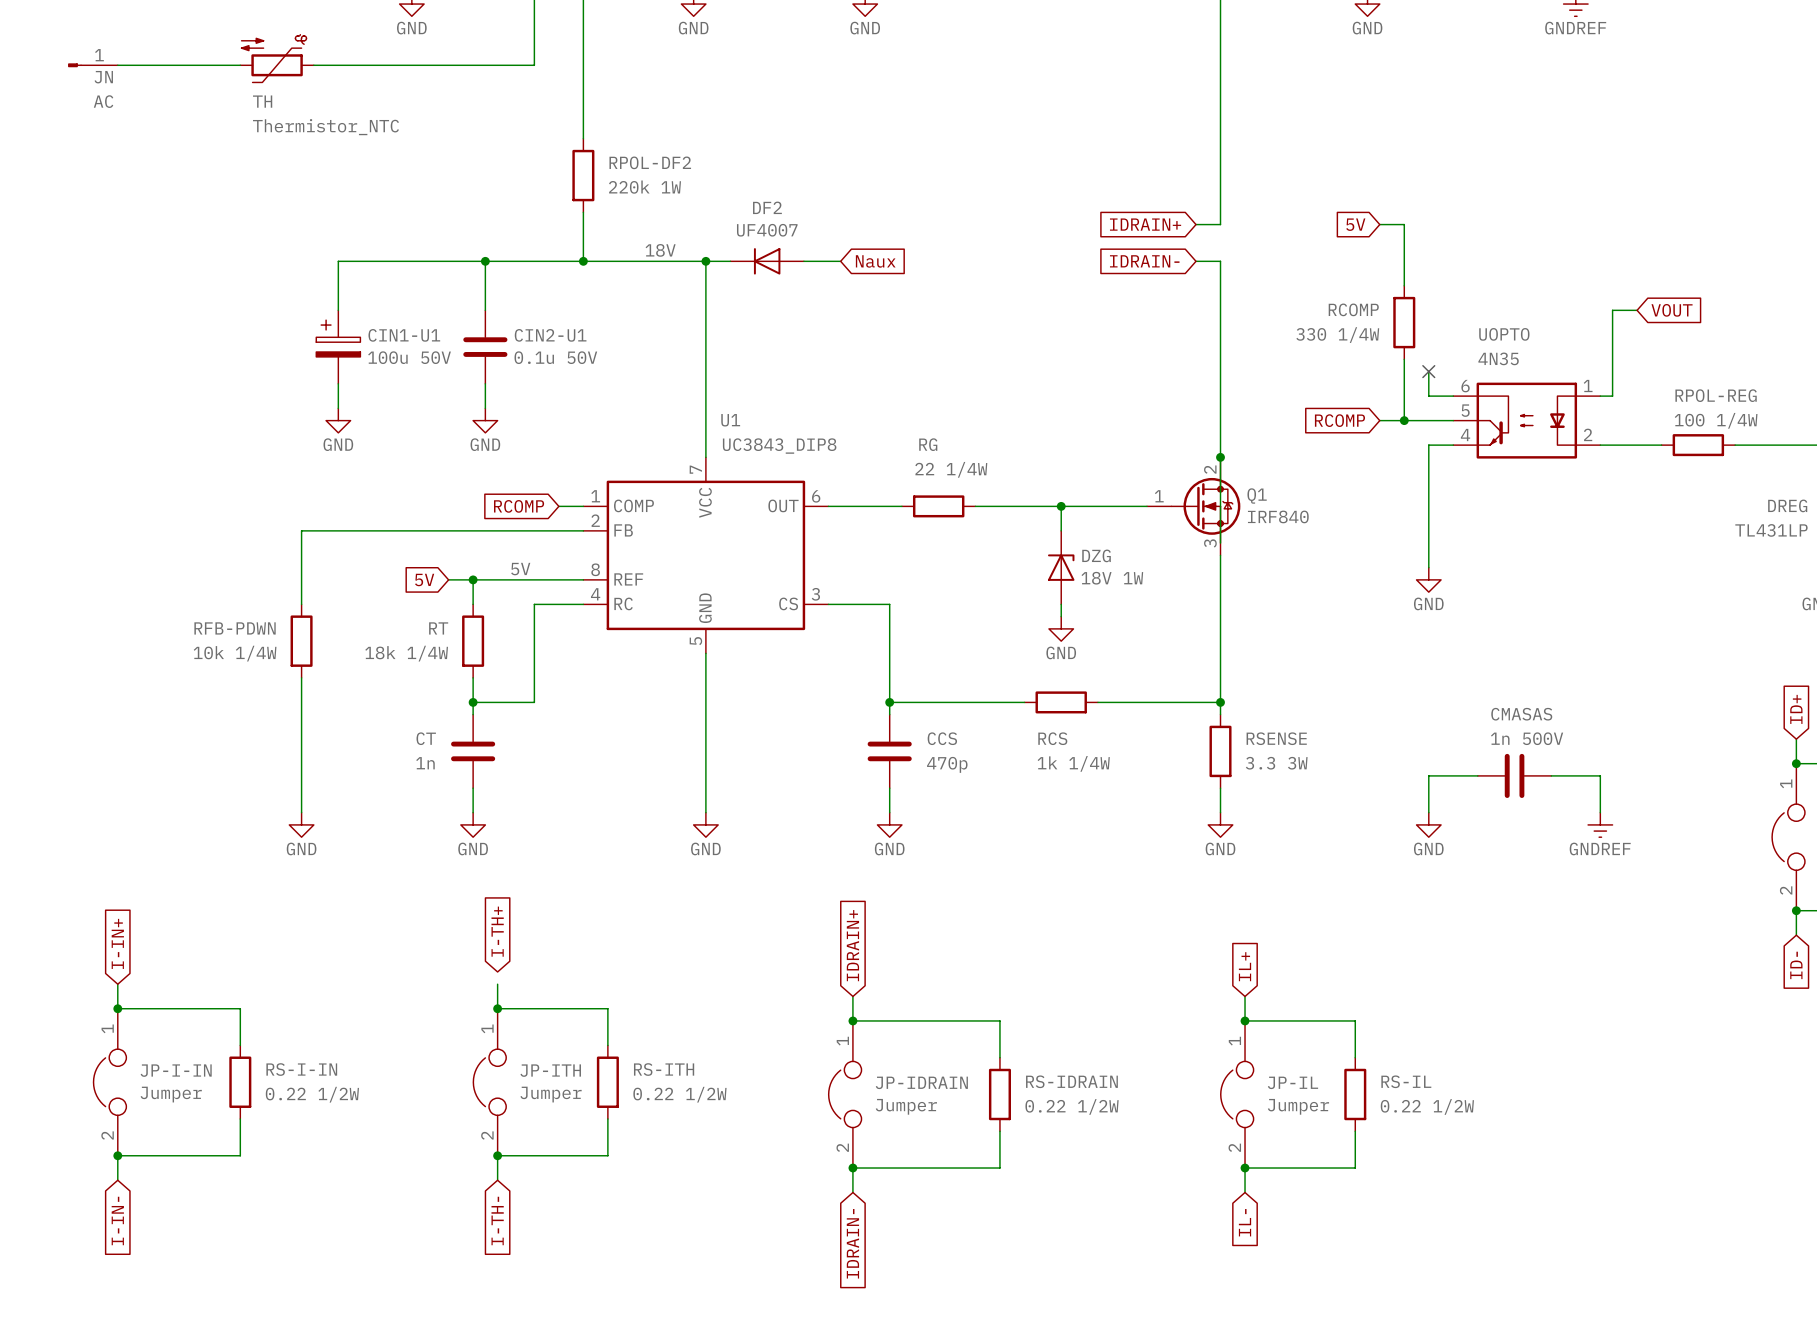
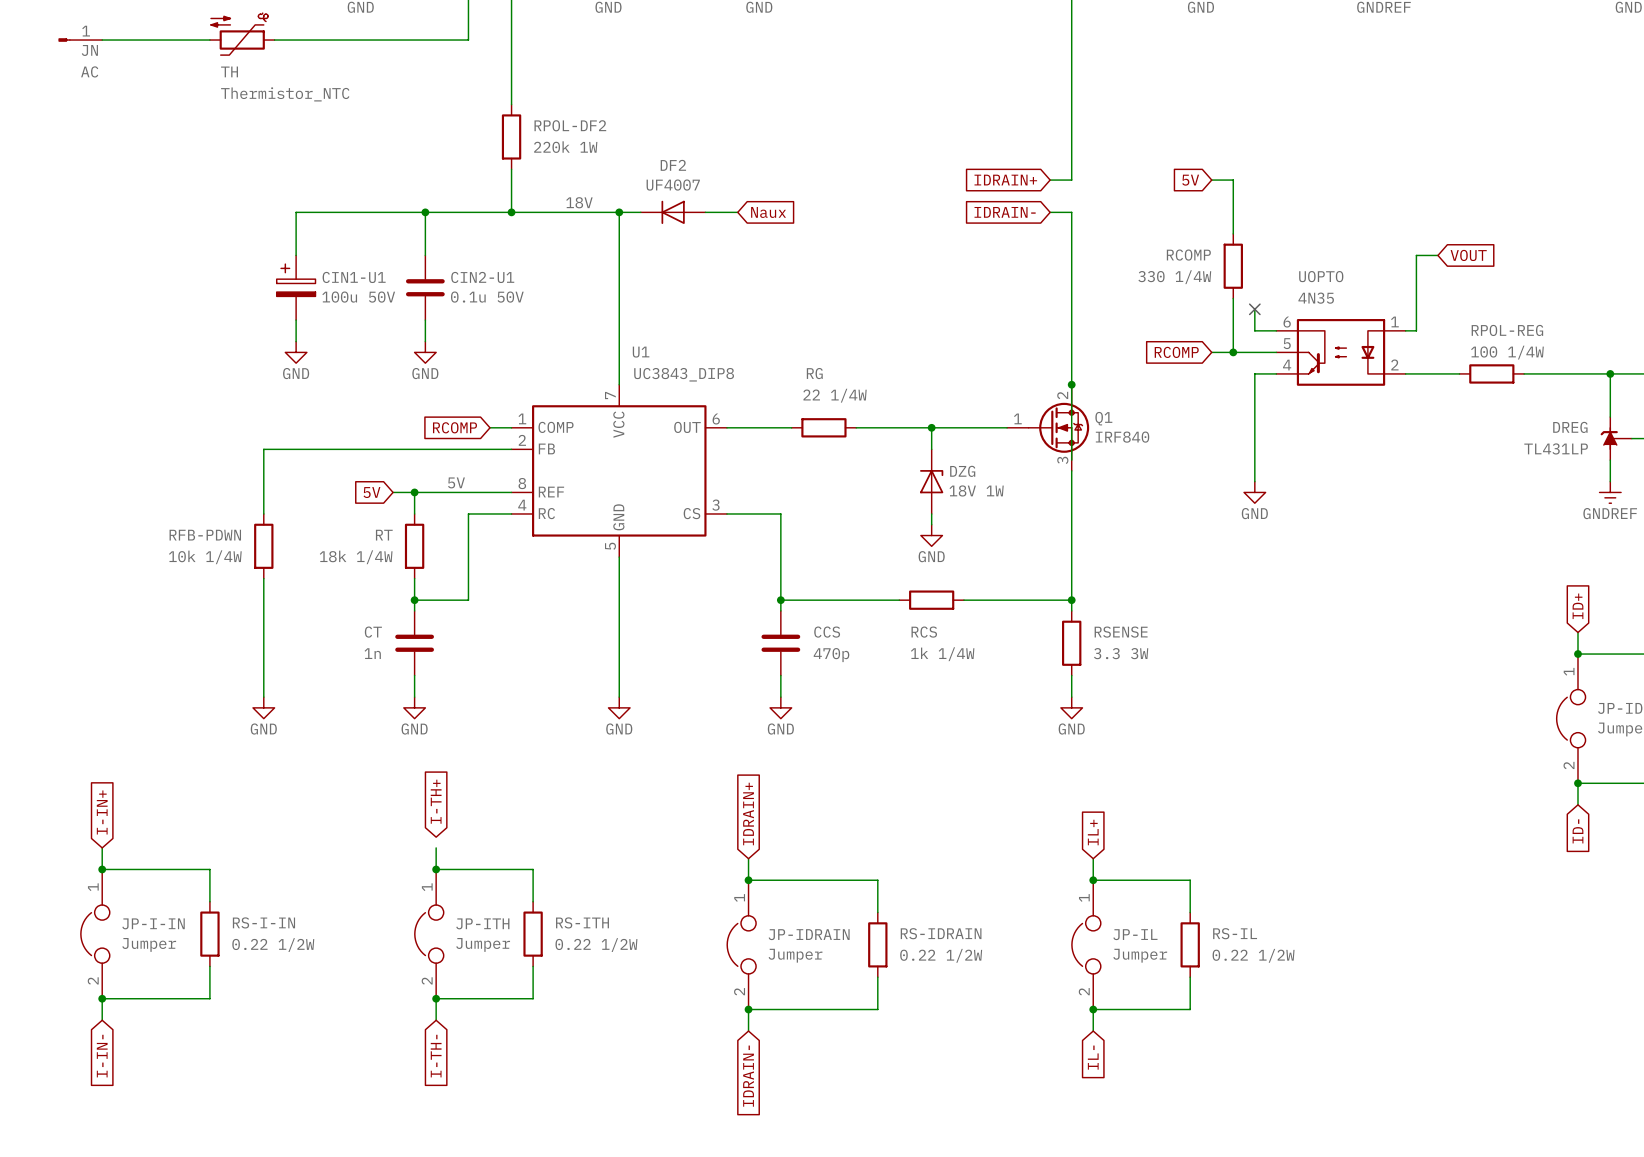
wire: (1477, 775) (1428, 775) (1428, 812) -> none
CMASAS: 1n 500V (1514, 775) -> none
wire: (1551, 775) (1600, 775) (1600, 812) -> none
power symbol: GND (1428, 824) -> none
power symbol: GNDREF (1600, 824) -> none

